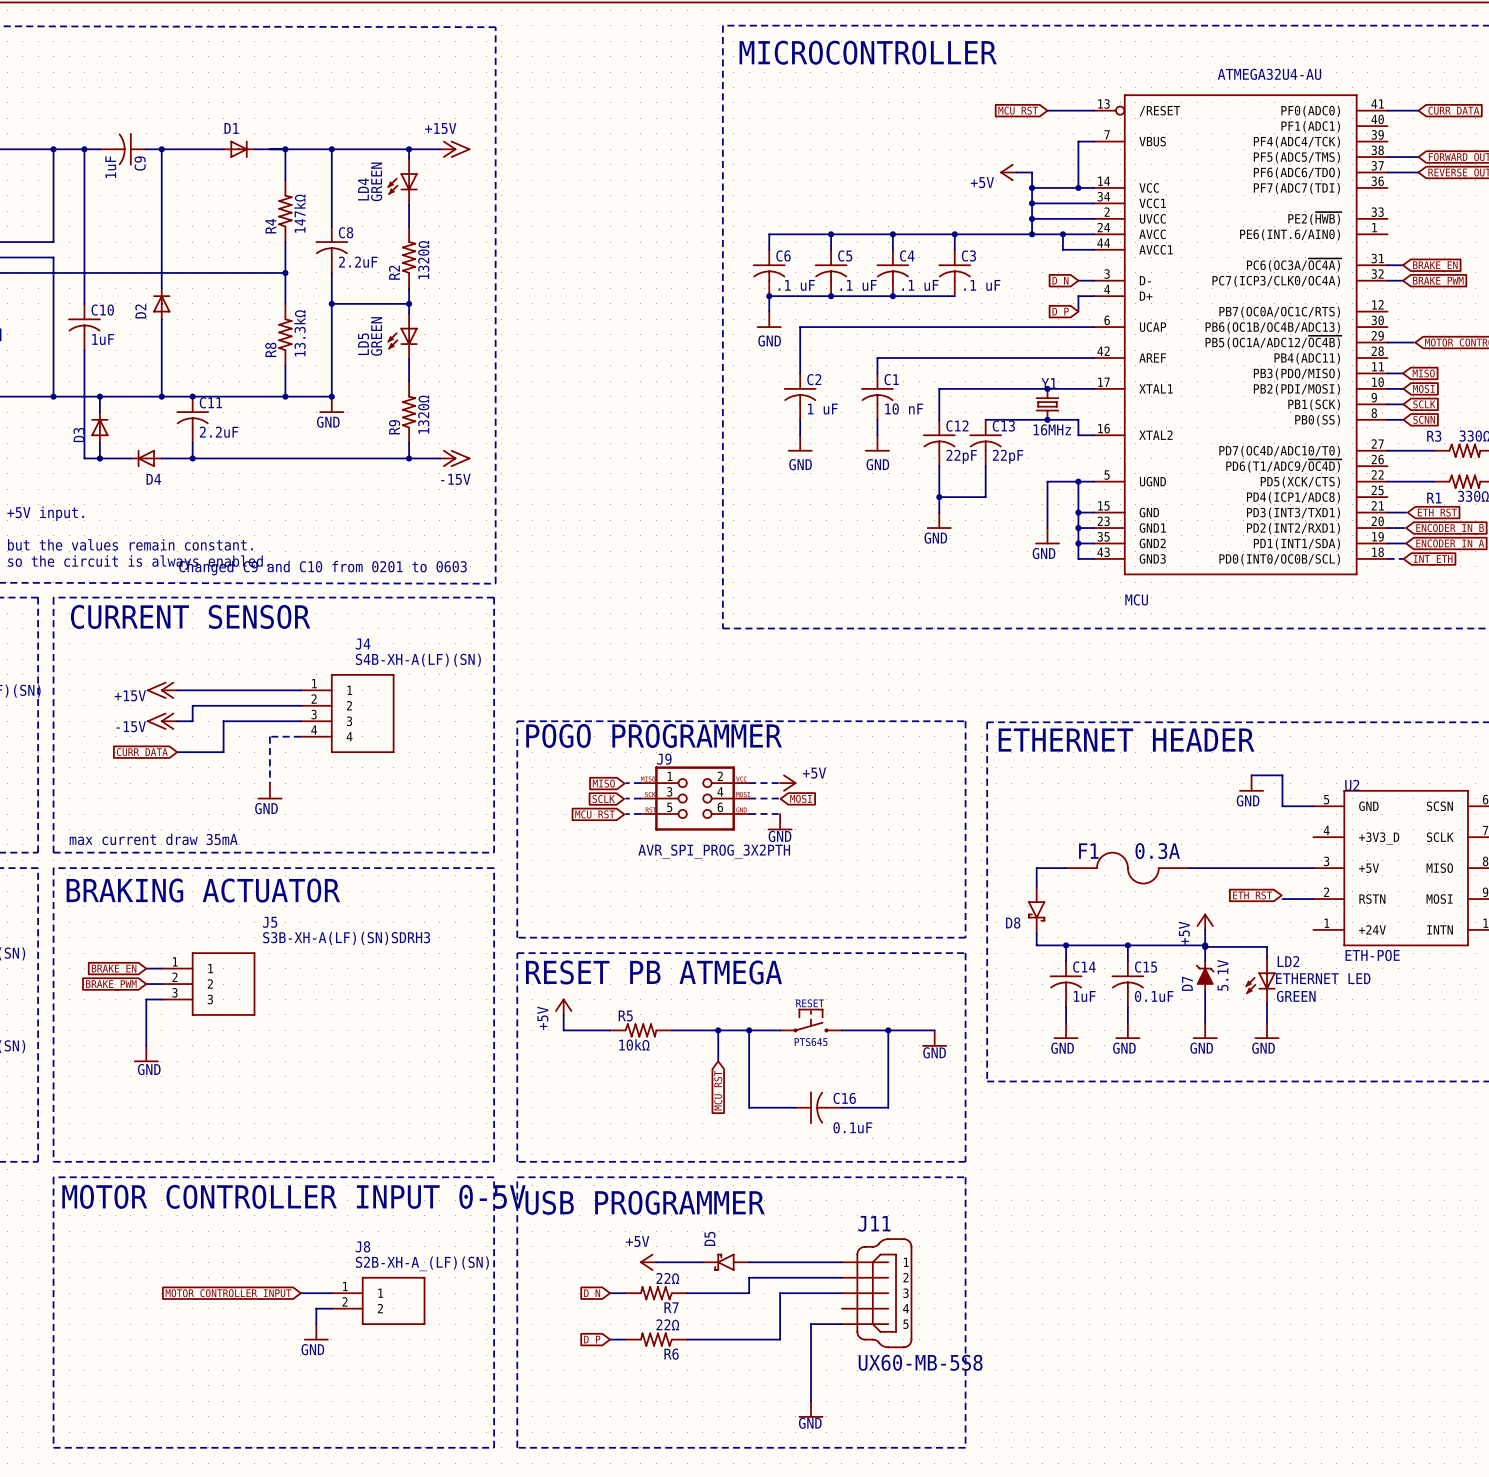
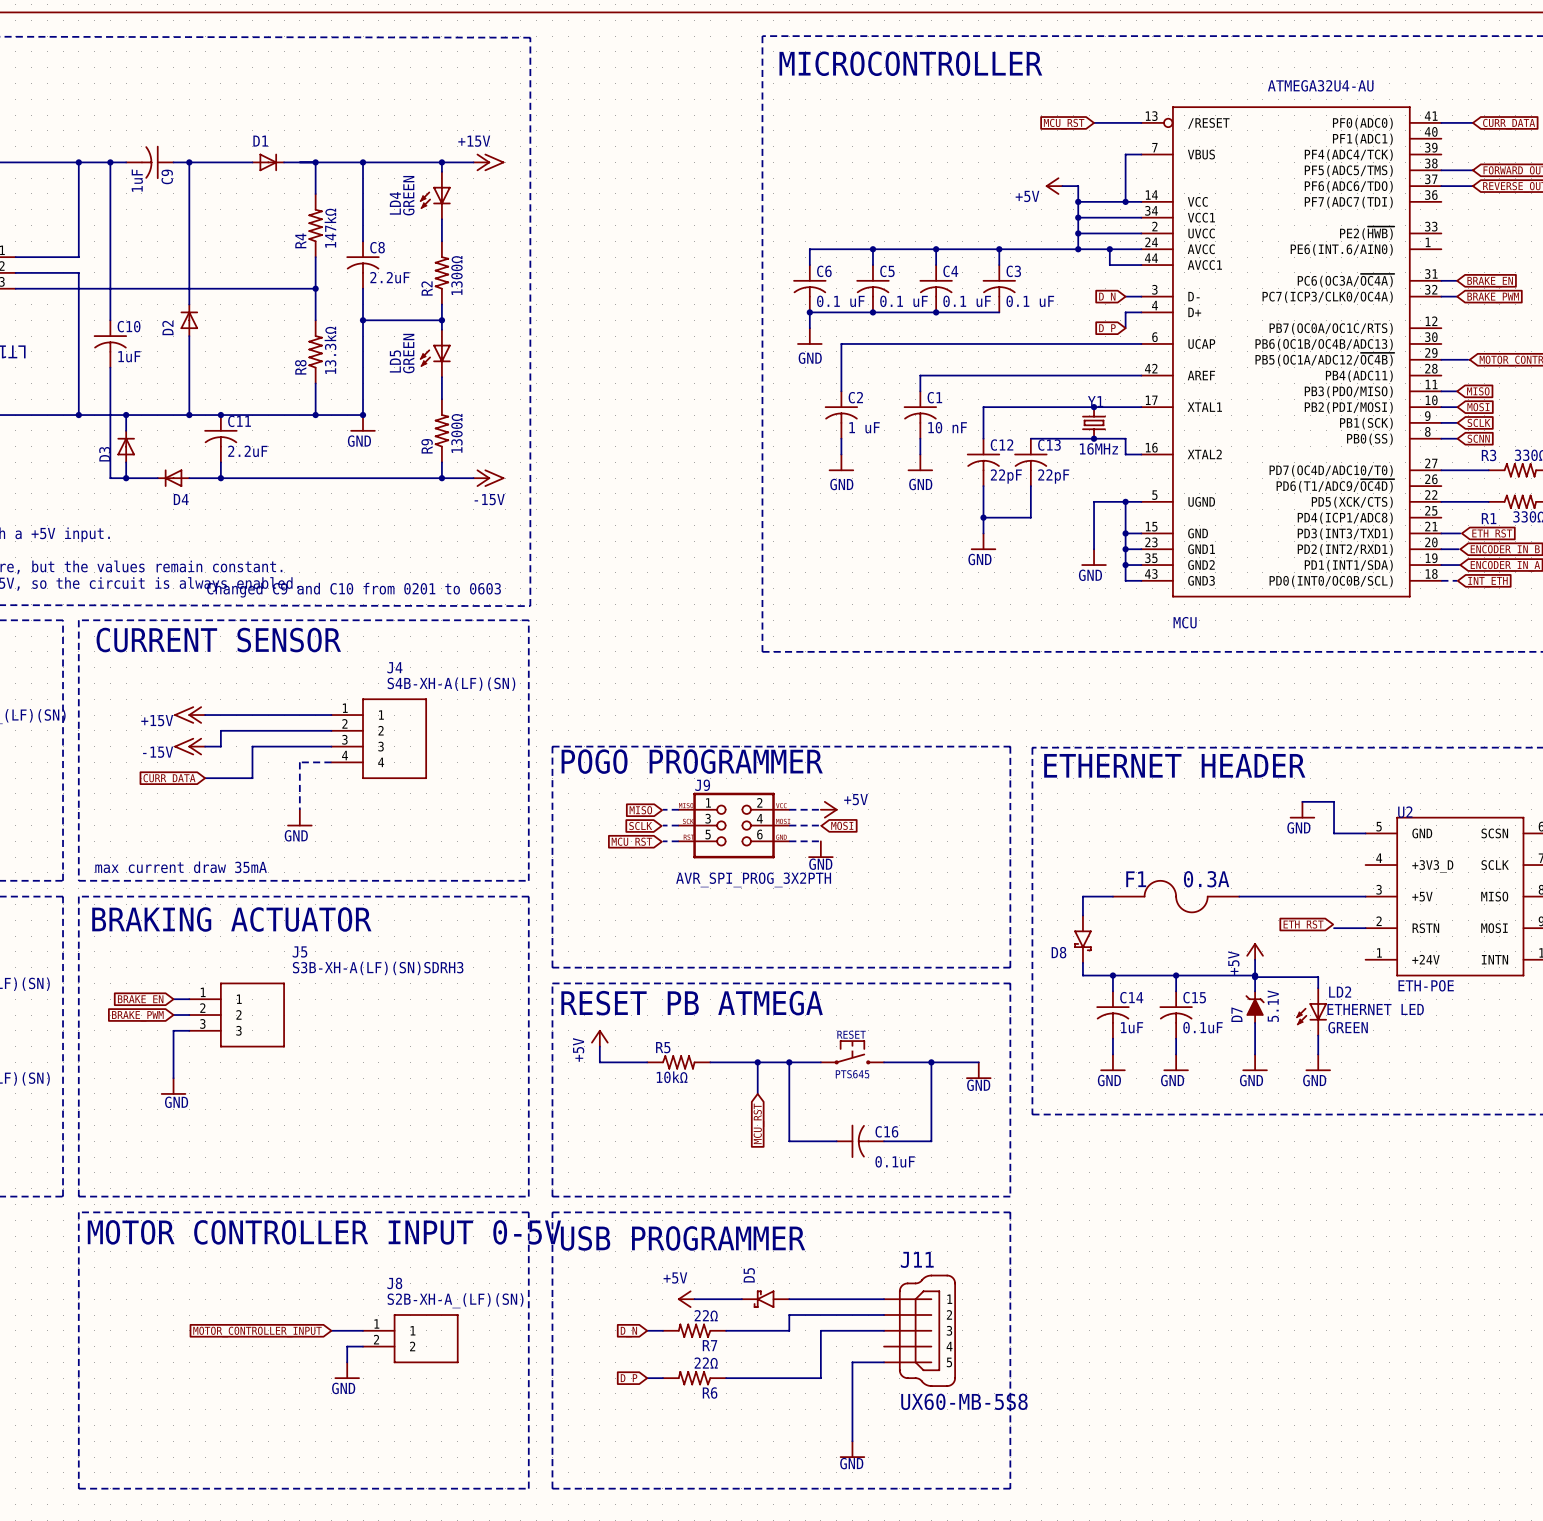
R2 value: 1320Ω (423, 260) -> 1300Ω (456, 275)
C6 value: .1 uF (796, 285) -> 0.1 uF (840, 301)
C5 value: .1 uF (858, 285) -> 0.1 uF (903, 301)
C4 value: .1 uF (920, 285) -> 0.1 uF (967, 301)
C3 value: .1 uF (982, 285) -> 0.1 uF (1030, 301)
R9 value: 1320Ω (423, 414) -> 1300Ω (456, 433)

